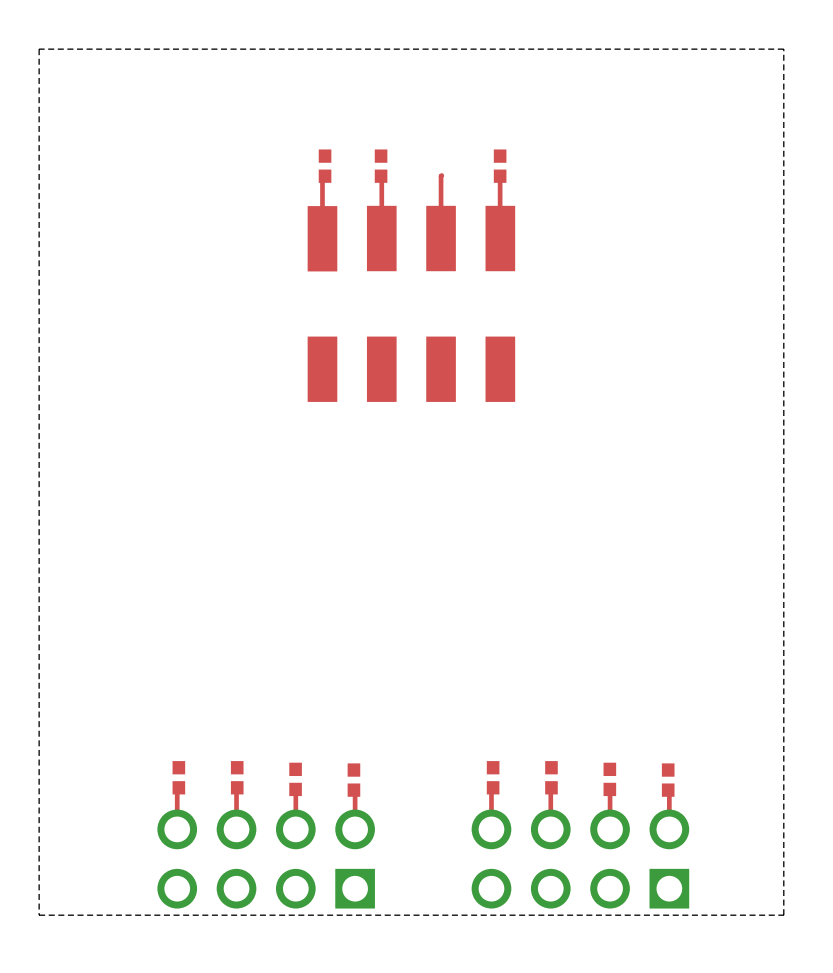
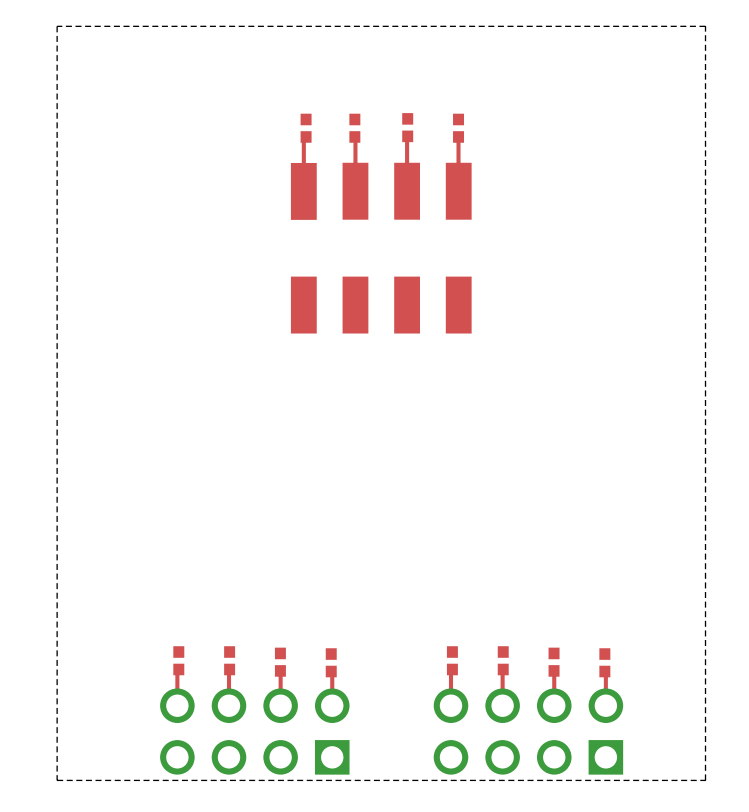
part: none -> (407, 127)

